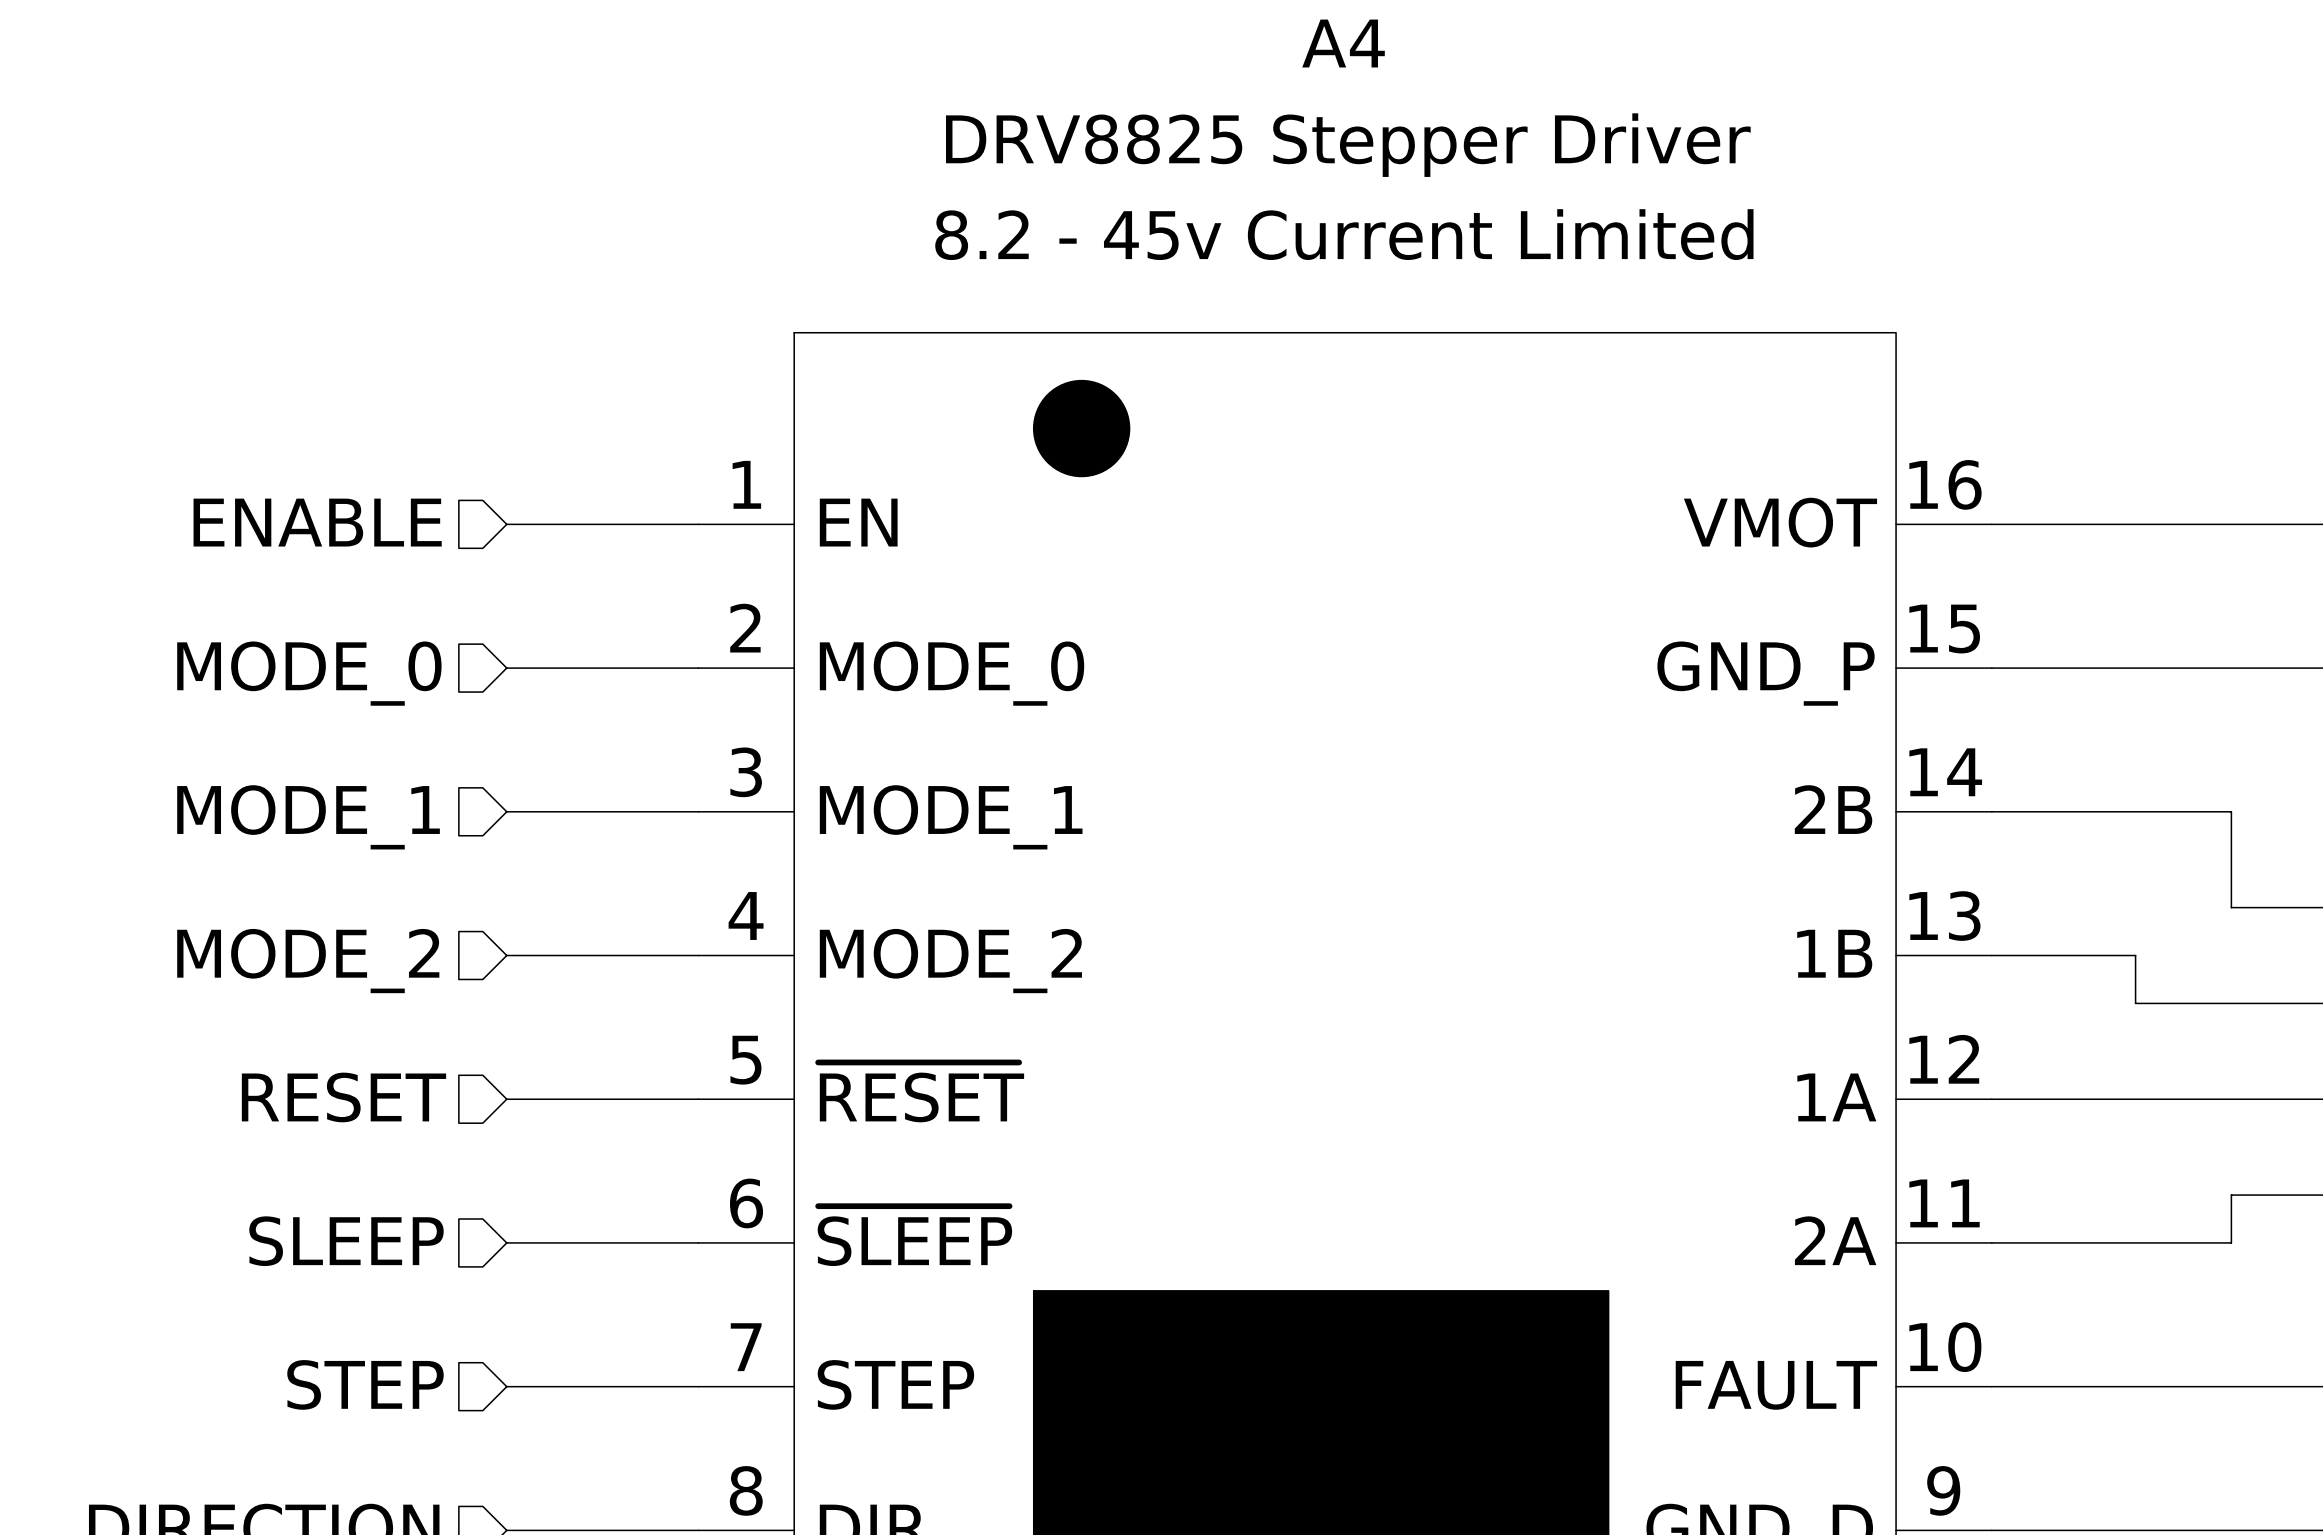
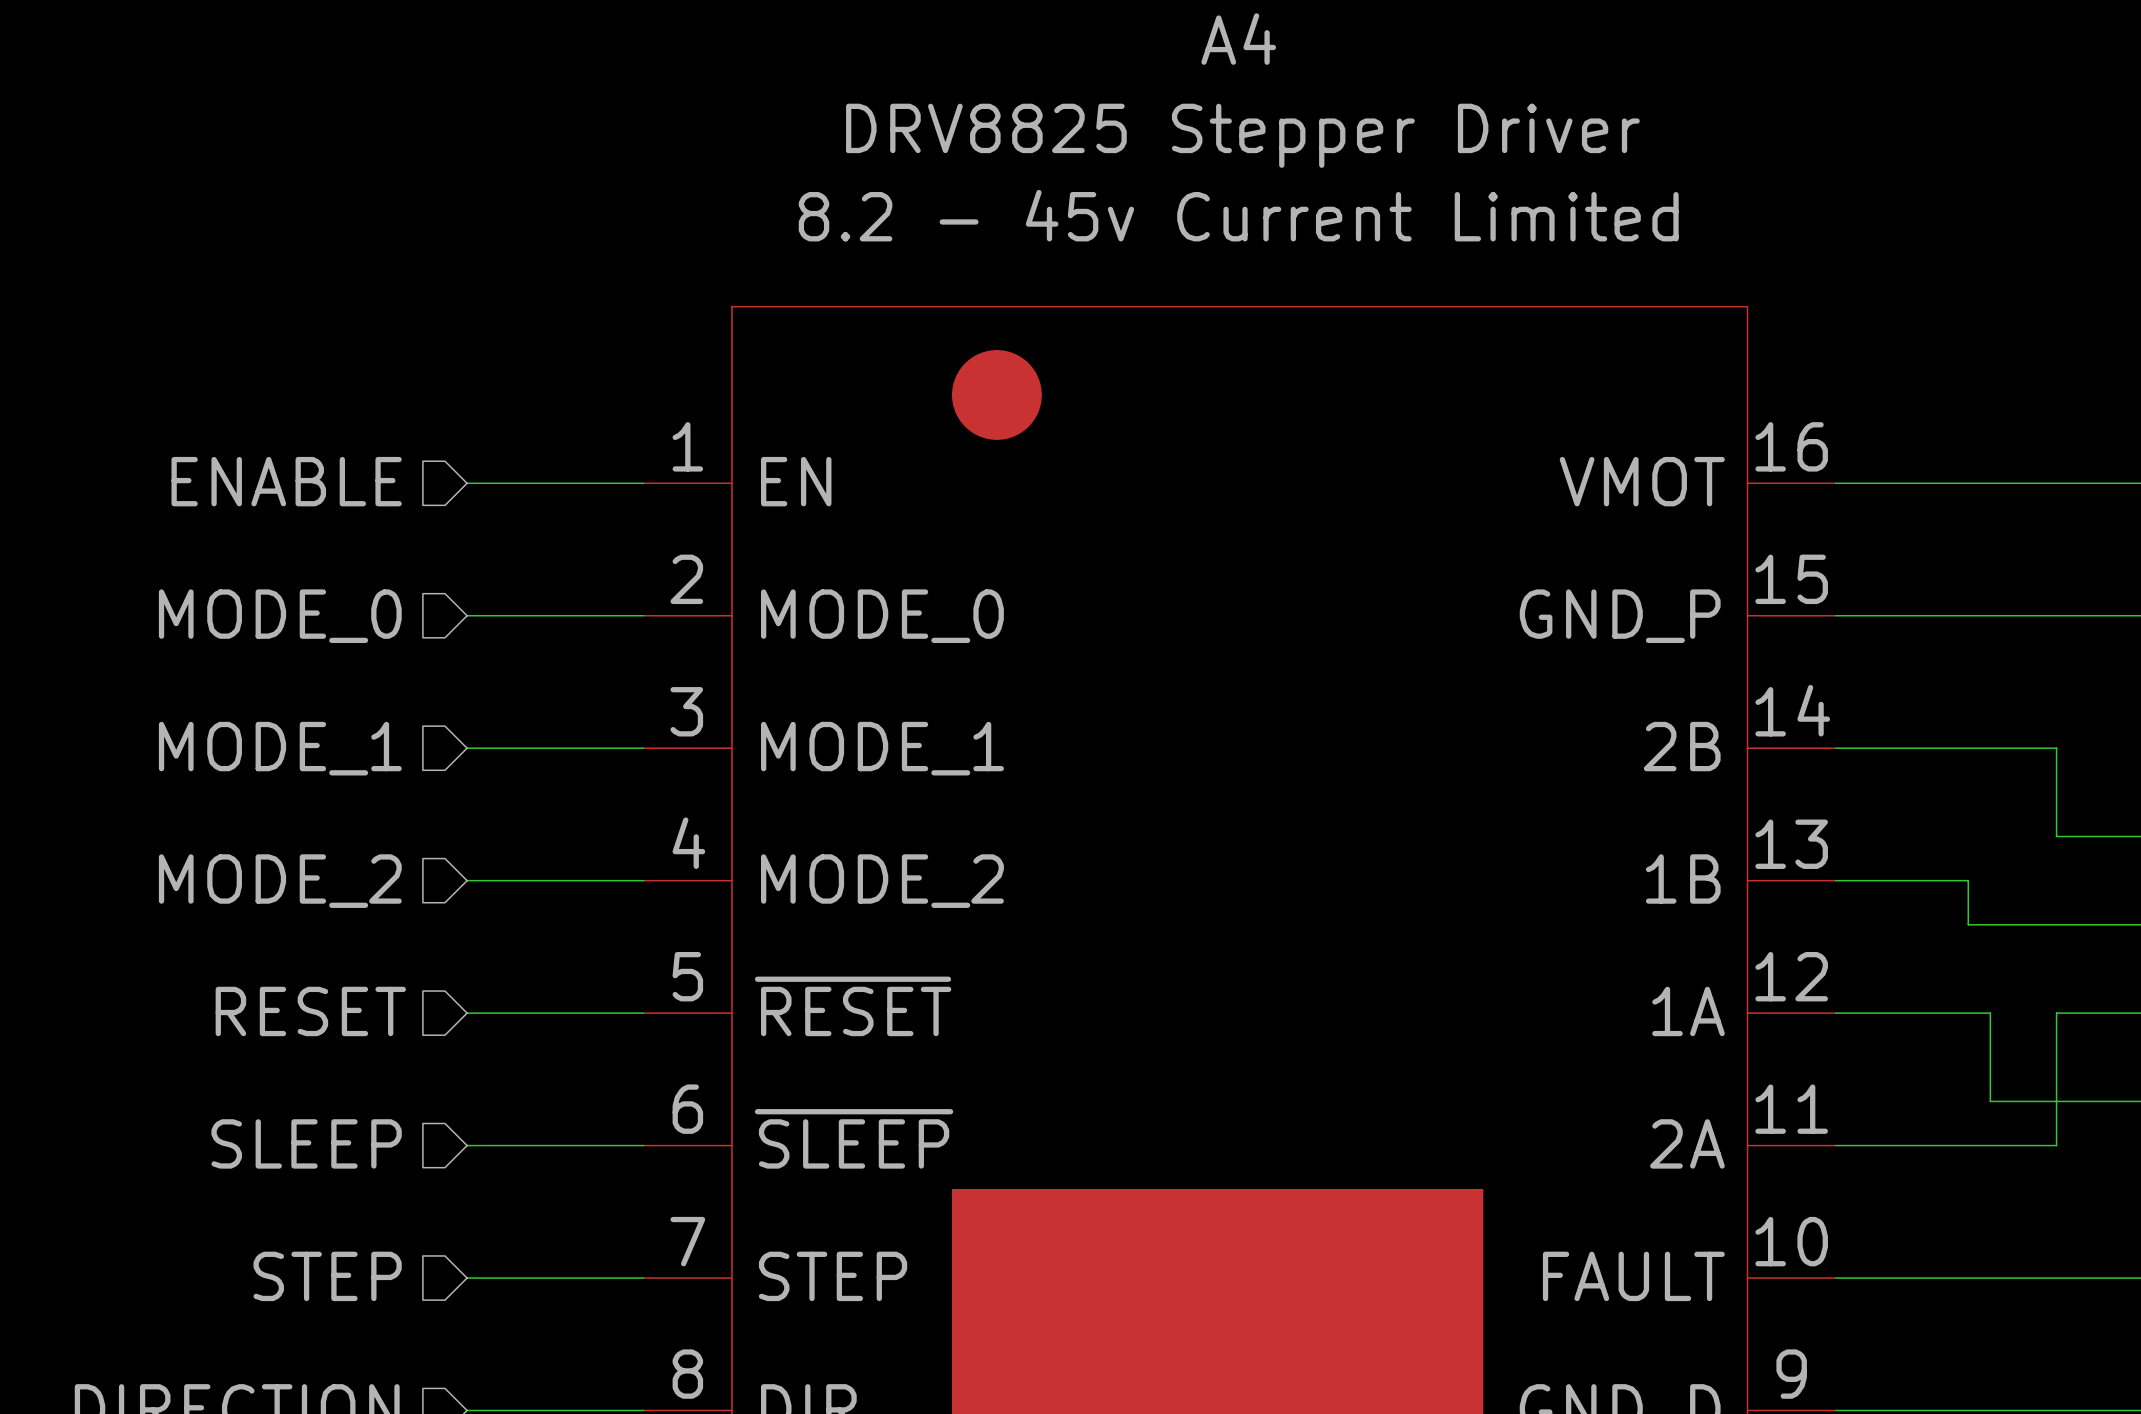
wire: (2159, 1099) (2231, 1099) -> (1990, 1013) (1990, 1101) (2056, 1101) (2056, 1013)

